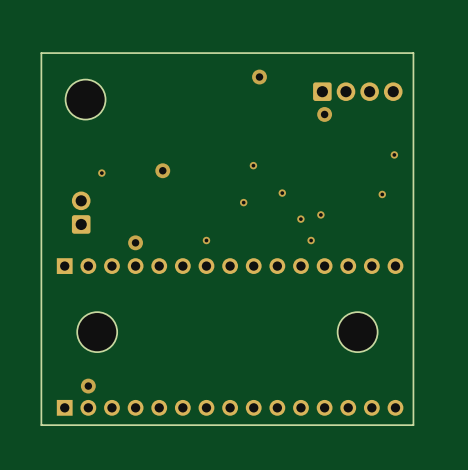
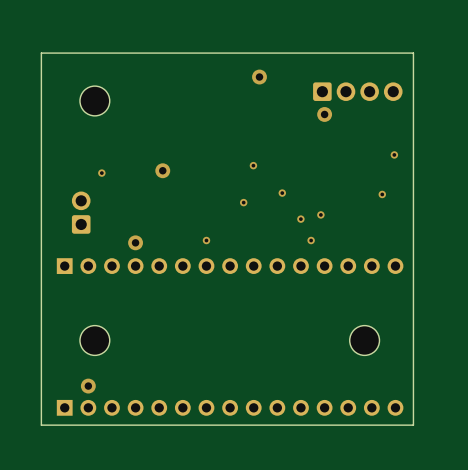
part: (85, 99) -> none
part: none -> (94, 100)
part footprint: [77, 312, 118, 353] -> [79, 325, 110, 356]
part: (357, 332) -> none
part: none -> (364, 340)

